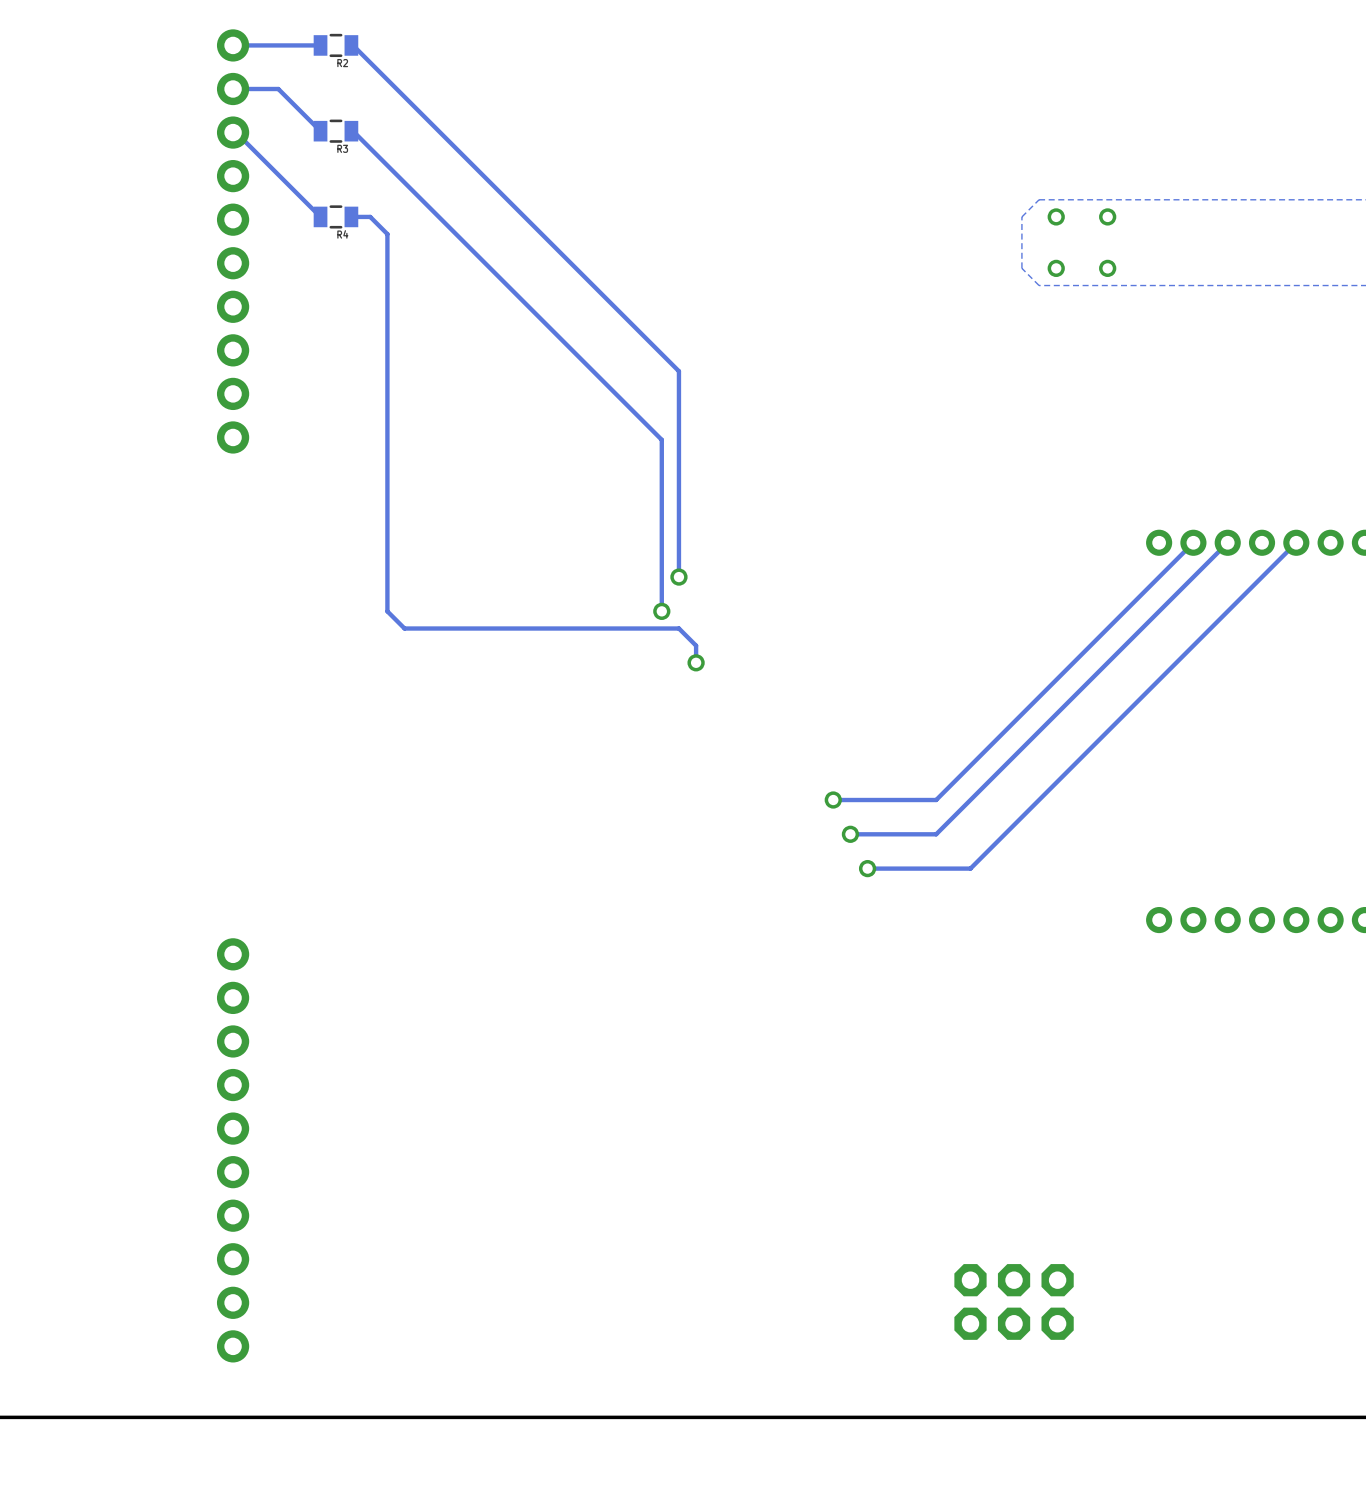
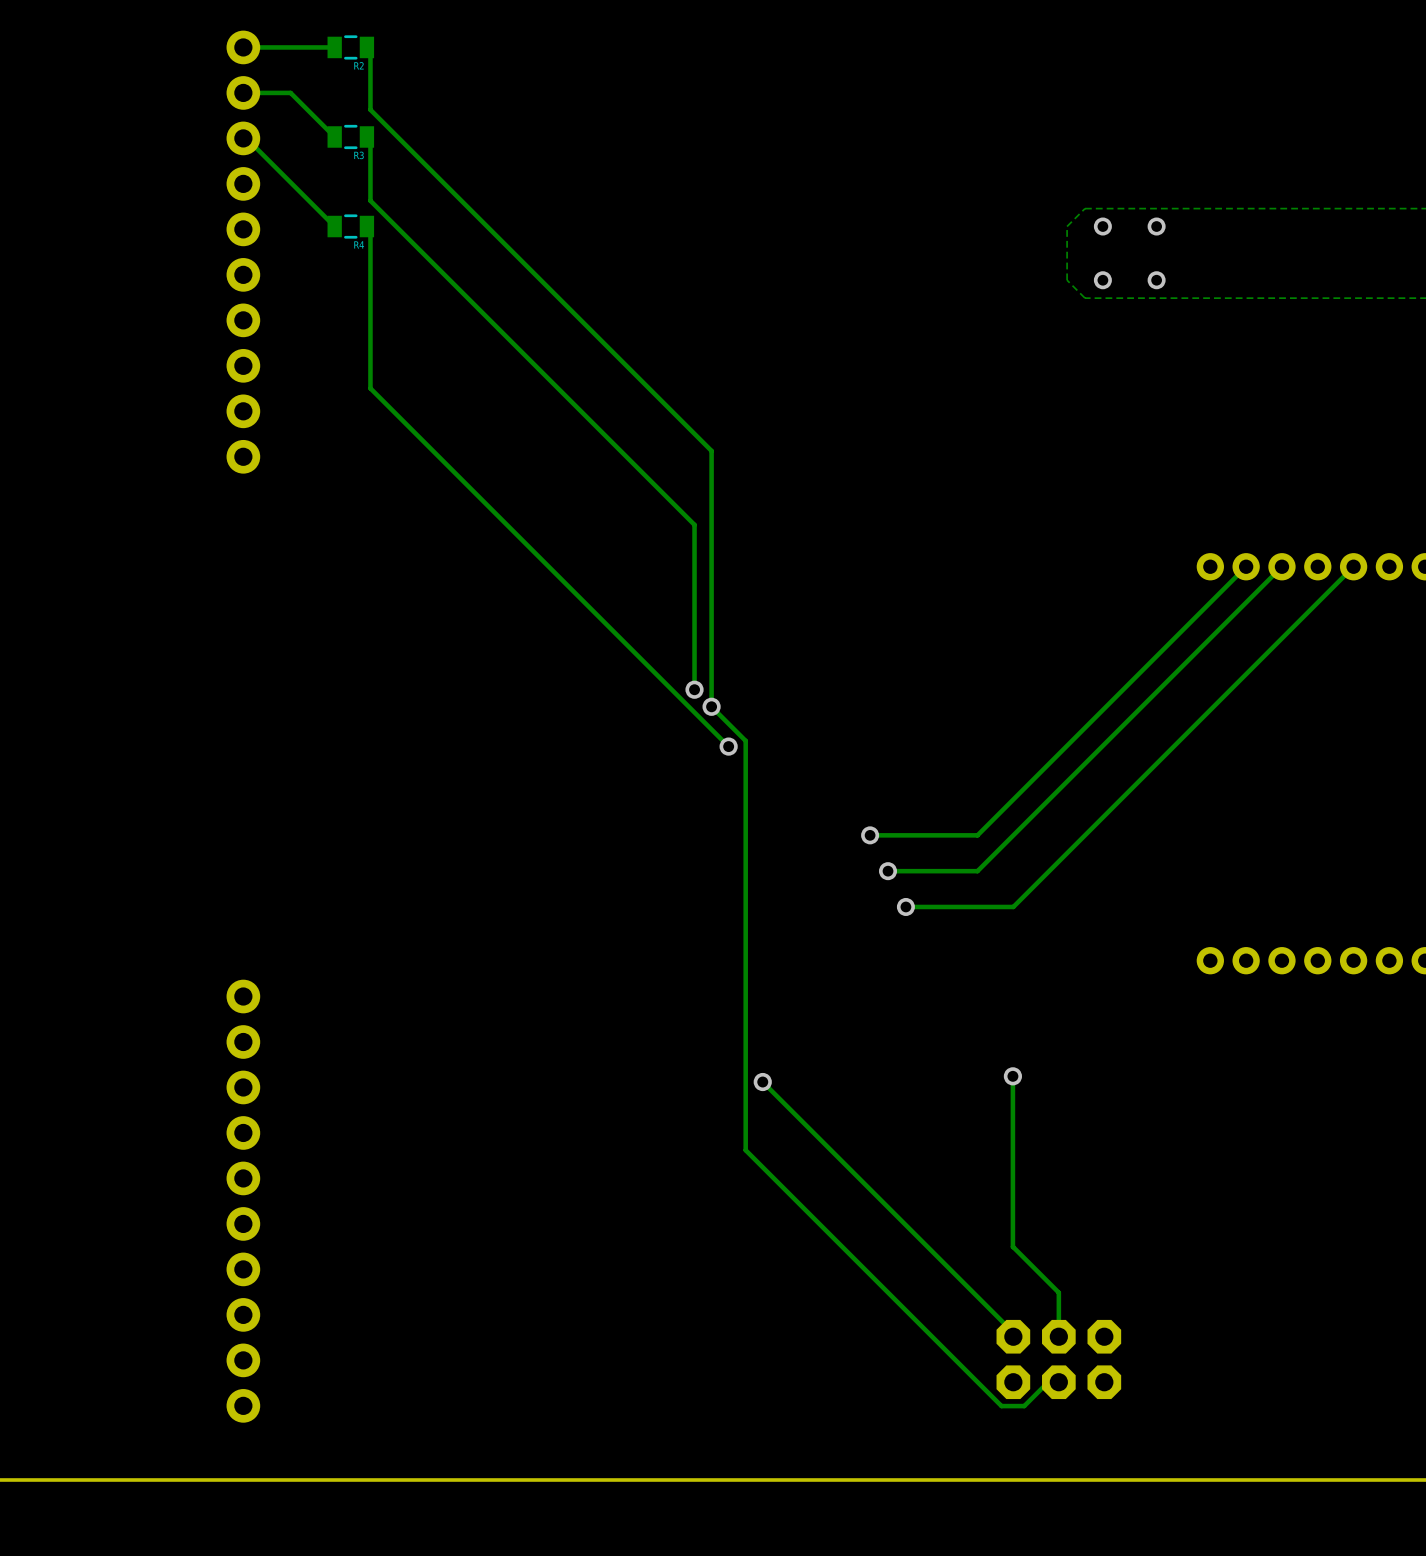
track: (351, 45) (678, 371) (678, 577) -> (366, 47) (370, 52) (370, 109) (711, 450) (711, 706) (745, 740) (745, 1150) (1001, 1406) (1024, 1406) (1047, 1383) (1058, 1382)
track: (351, 131) (661, 439) (661, 611) -> (366, 136) (370, 138) (370, 200) (694, 524) (694, 689)
track: (351, 216) (370, 216) (387, 234) (387, 611) (404, 628) (678, 628) (696, 645) (696, 662) -> (366, 226) (370, 229) (370, 388) (728, 746)
via: (678, 577) -> none
via: (661, 611) -> none
via: none -> (694, 689)
via: (696, 662) -> none
via: none -> (711, 706)
via: none -> (728, 746)
track: none -> (1012, 1076) (1012, 1246) (1058, 1292) (1058, 1336)
via: none -> (1012, 1076)
track: none -> (762, 1082) (1012, 1332) (1013, 1336)
via: none -> (762, 1082)

